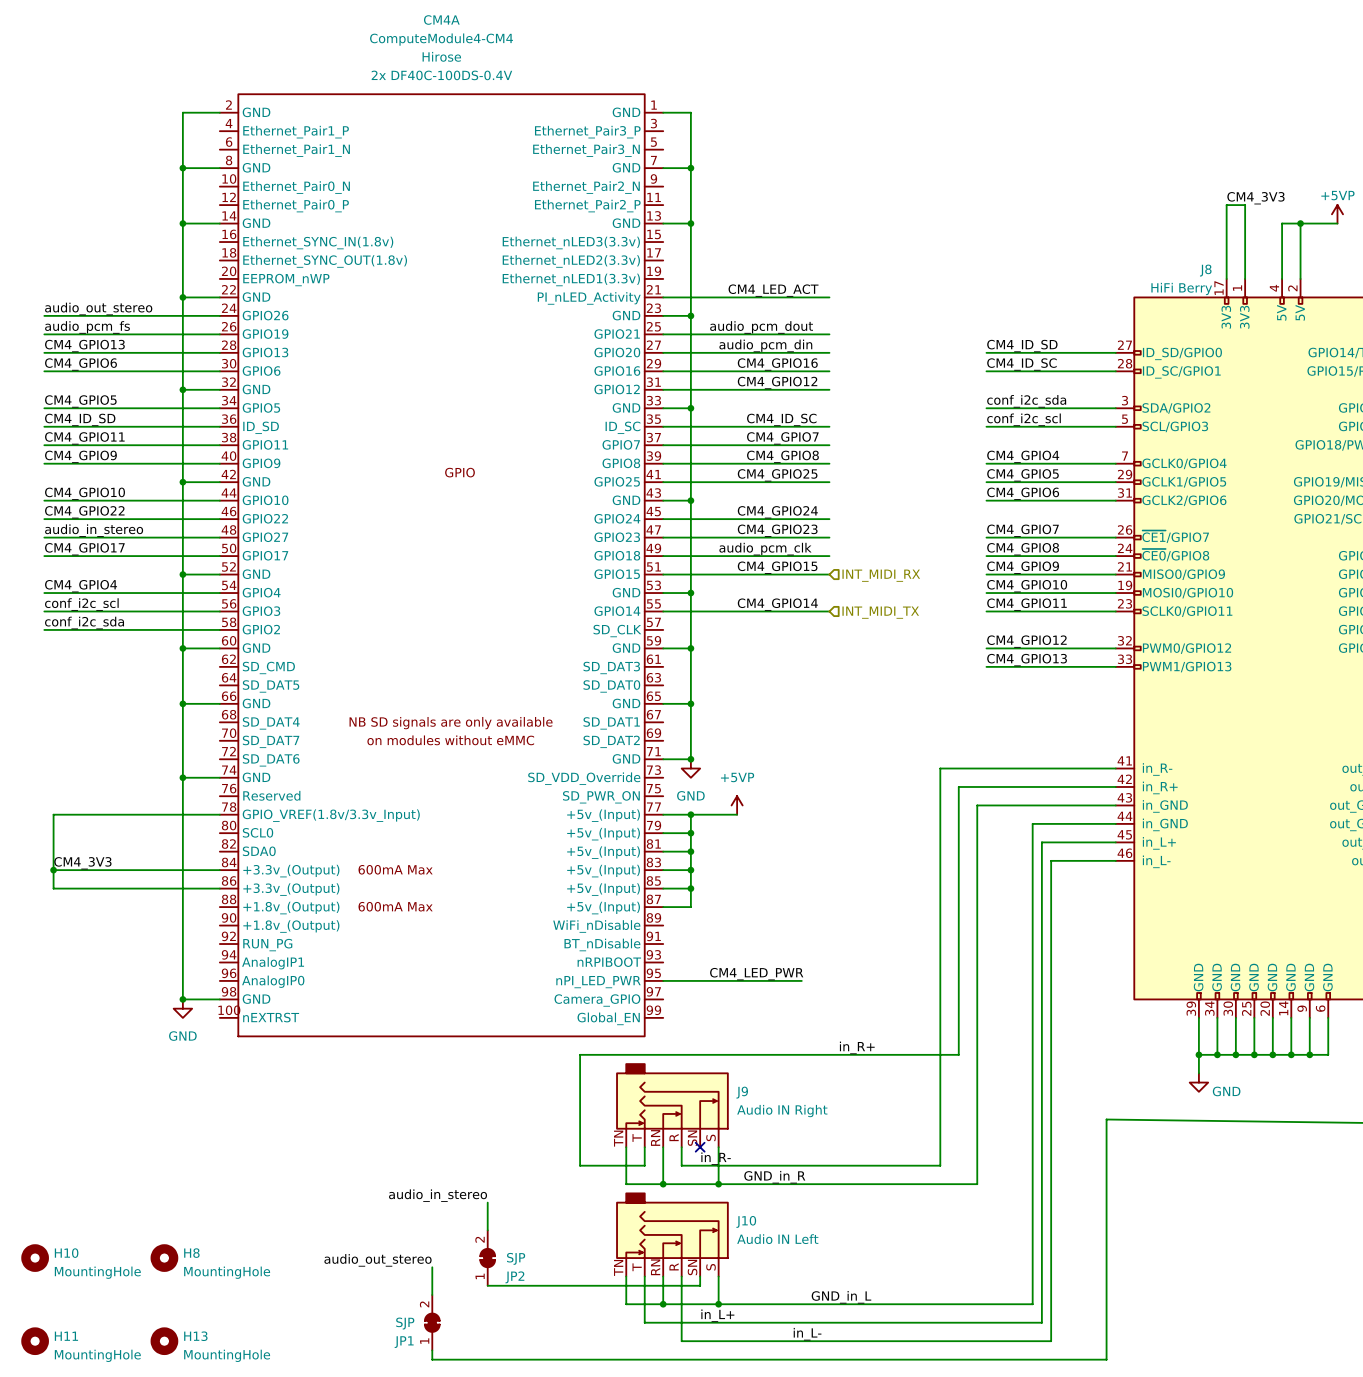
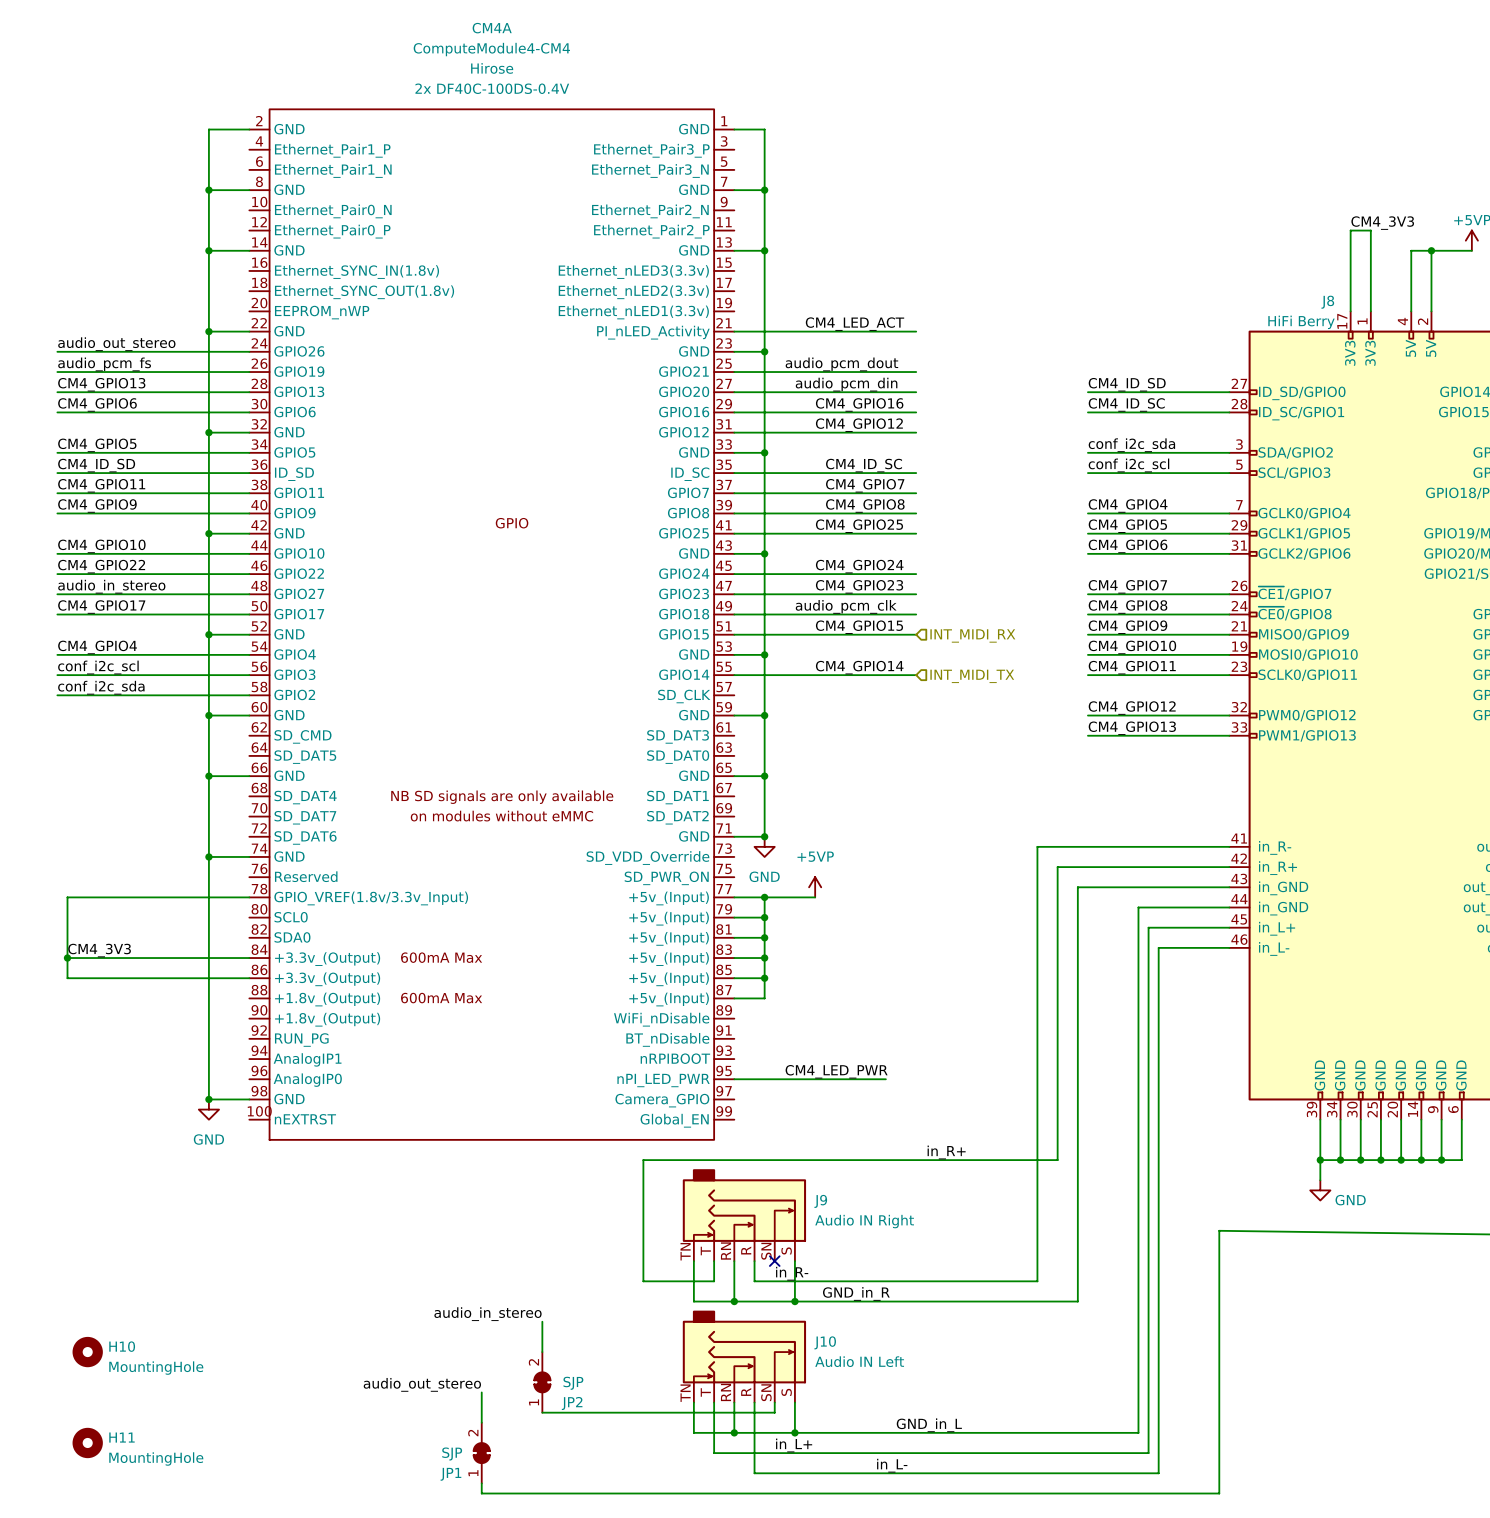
H10 position: (35, 1258) -> (87, 1352)
H8: MountingHole (164, 1258) -> none
H11 position: (35, 1341) -> (87, 1442)
H13: MountingHole (164, 1341) -> none

